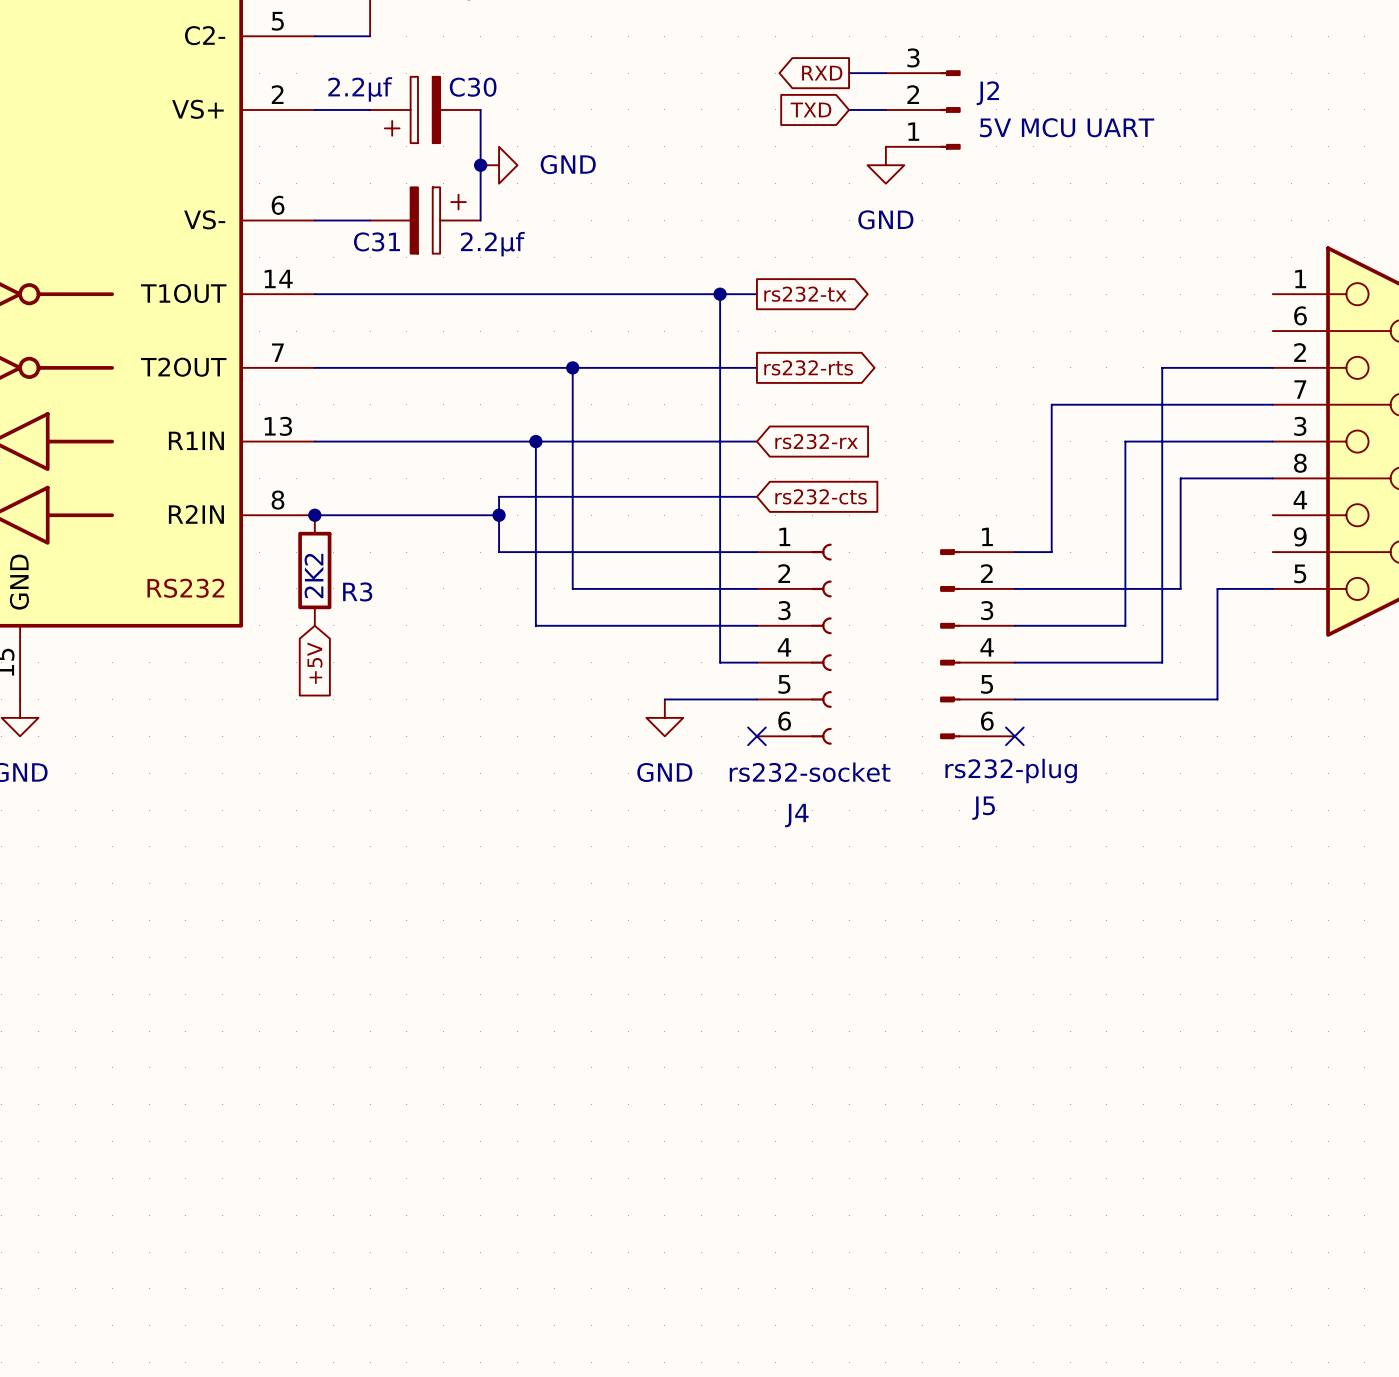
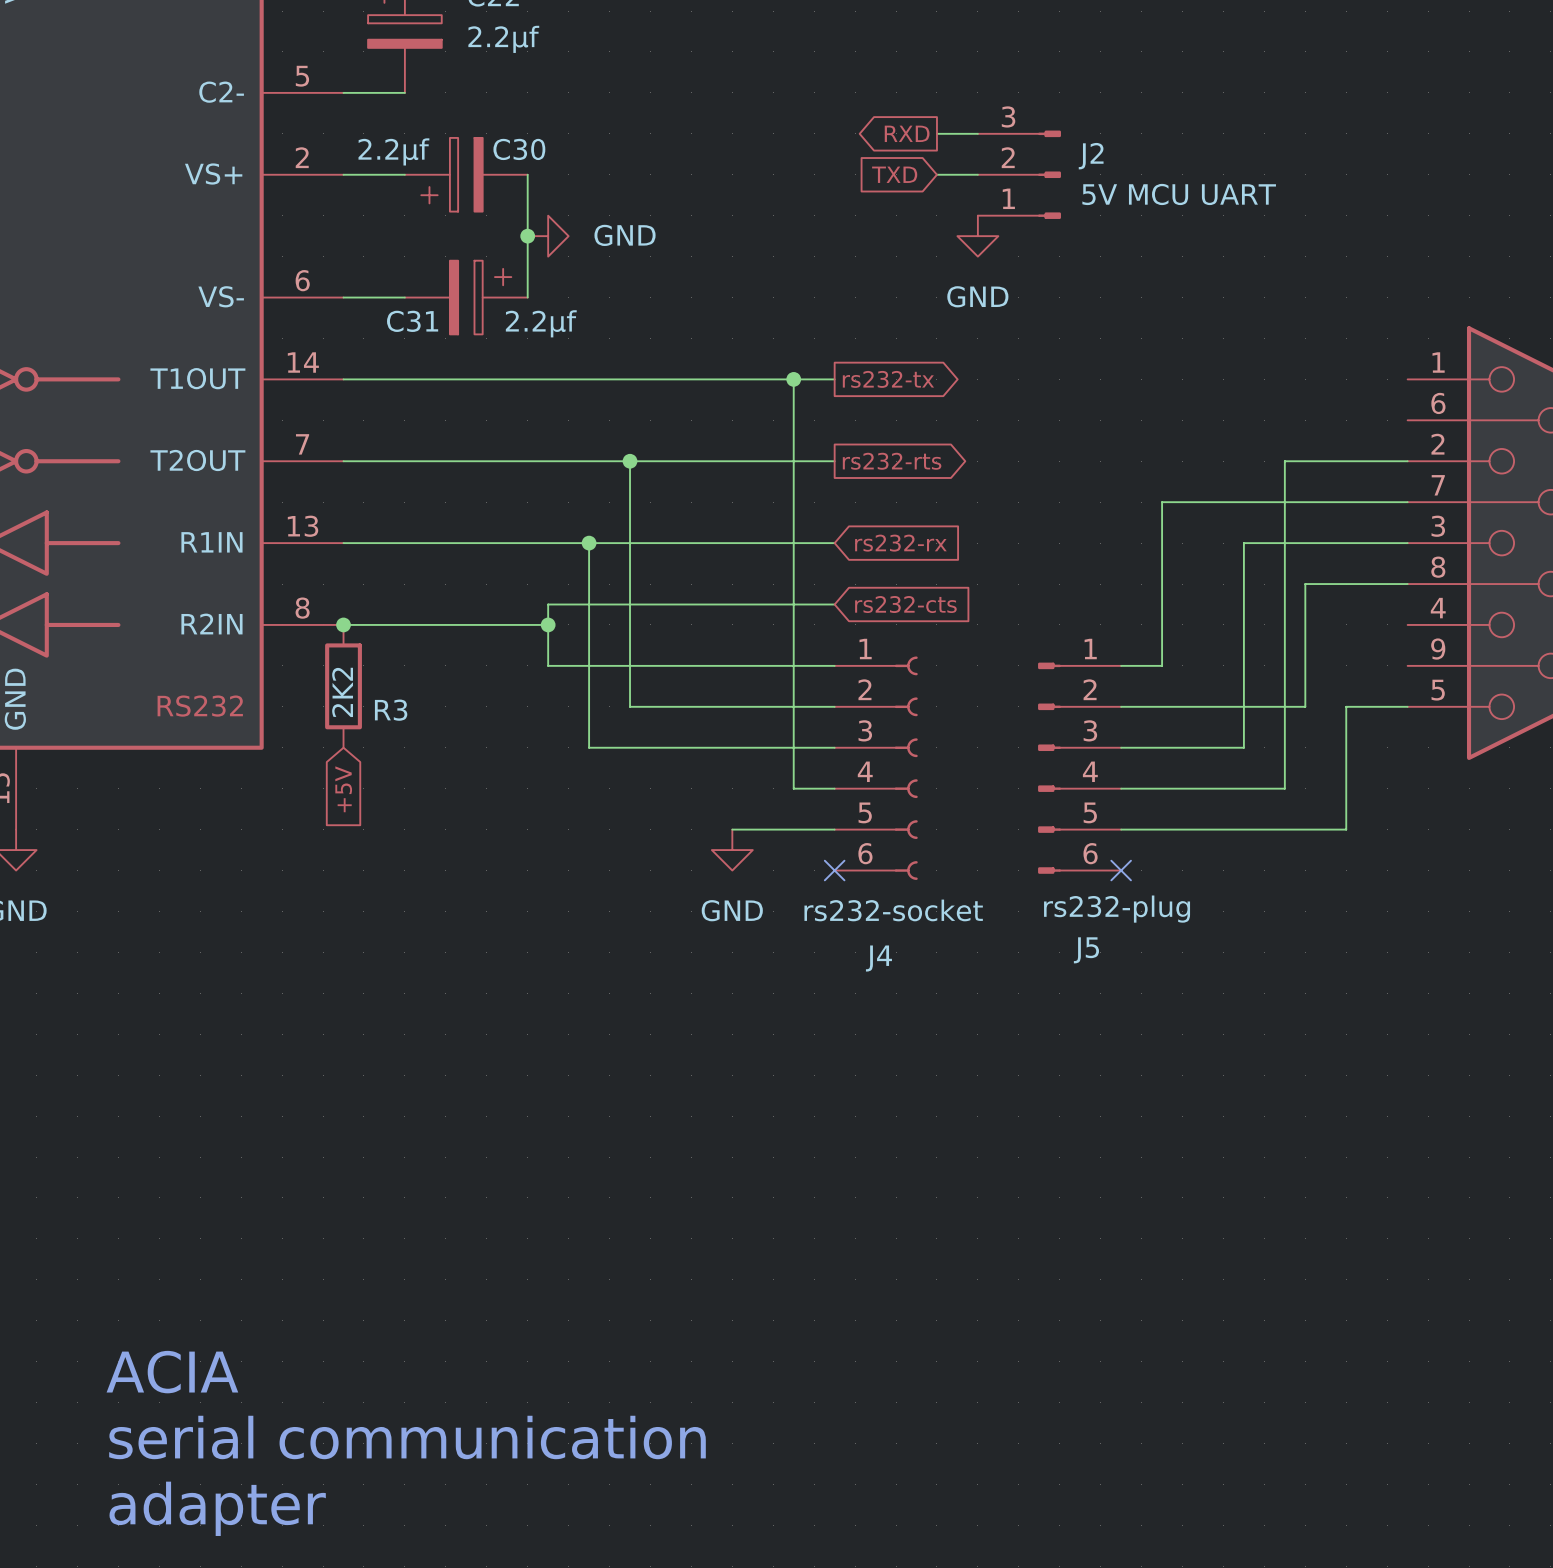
text: none -> ACIA (172, 1372)
text: none -> serial communication (407, 1437)
text: none -> adapter (217, 1508)

